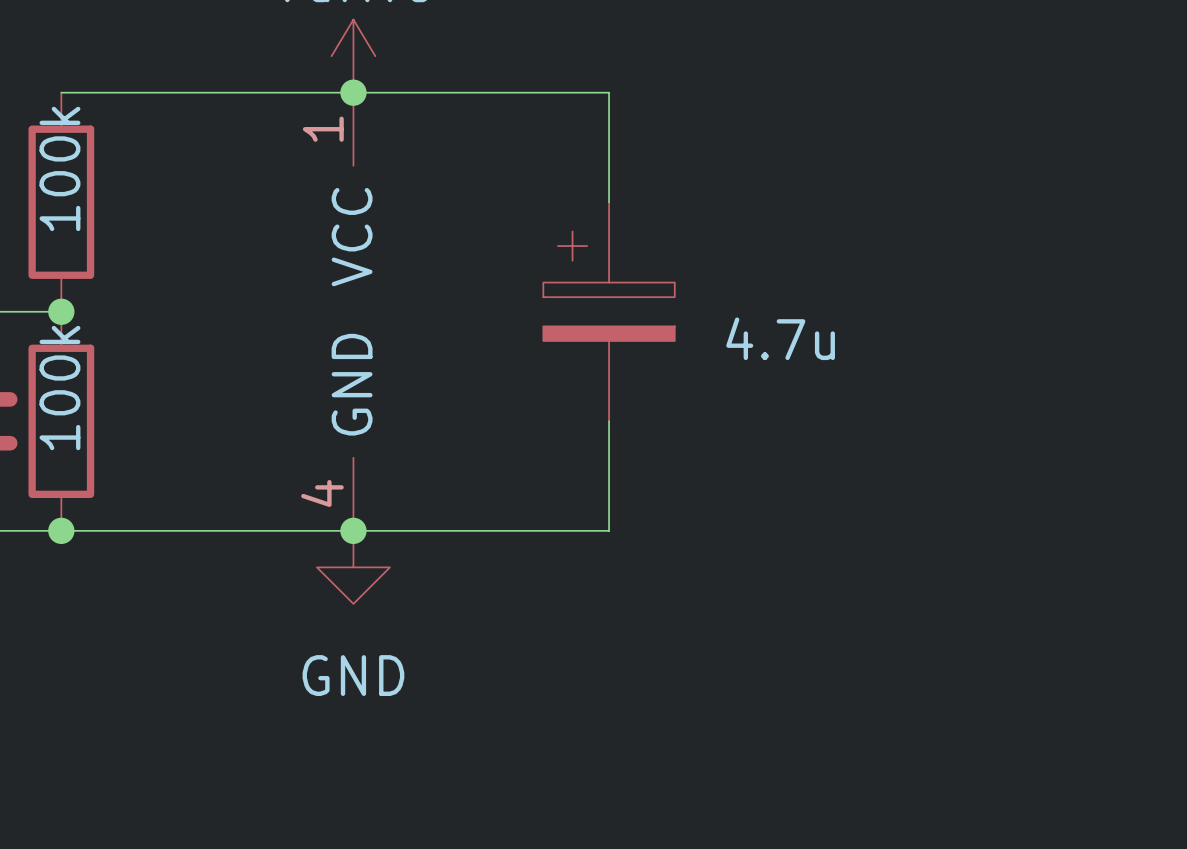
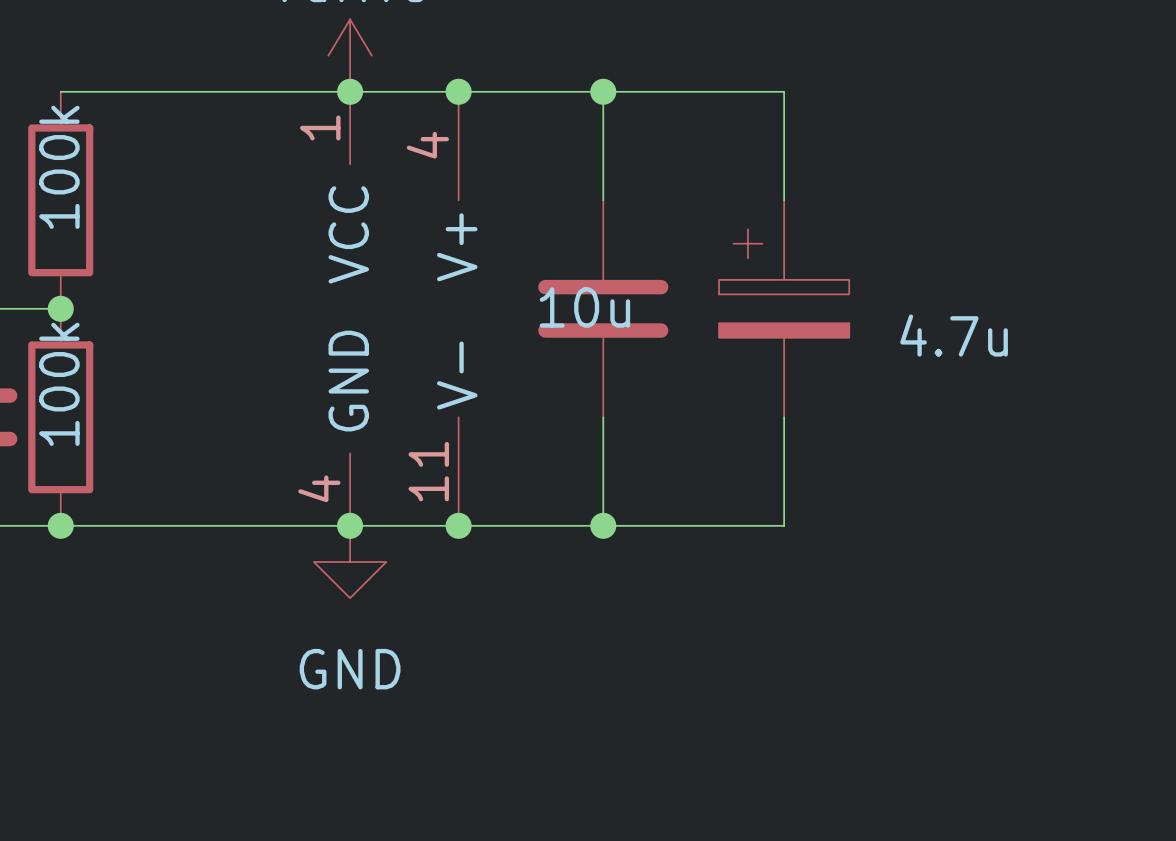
junction: none -> (458, 91)
wire: none -> (603, 91) (784, 91) (784, 200)
junction: none -> (603, 91)
part symbol: [543, 202, 675, 422] -> [538, 200, 669, 418]
part: none -> (458, 308)
part: none -> 4.7u (784, 308)
part value: 4.7u (780, 338) -> 10u (584, 307)
wire: none -> (784, 417) (784, 525) (603, 525)
junction: none -> (458, 525)
junction: none -> (603, 525)

